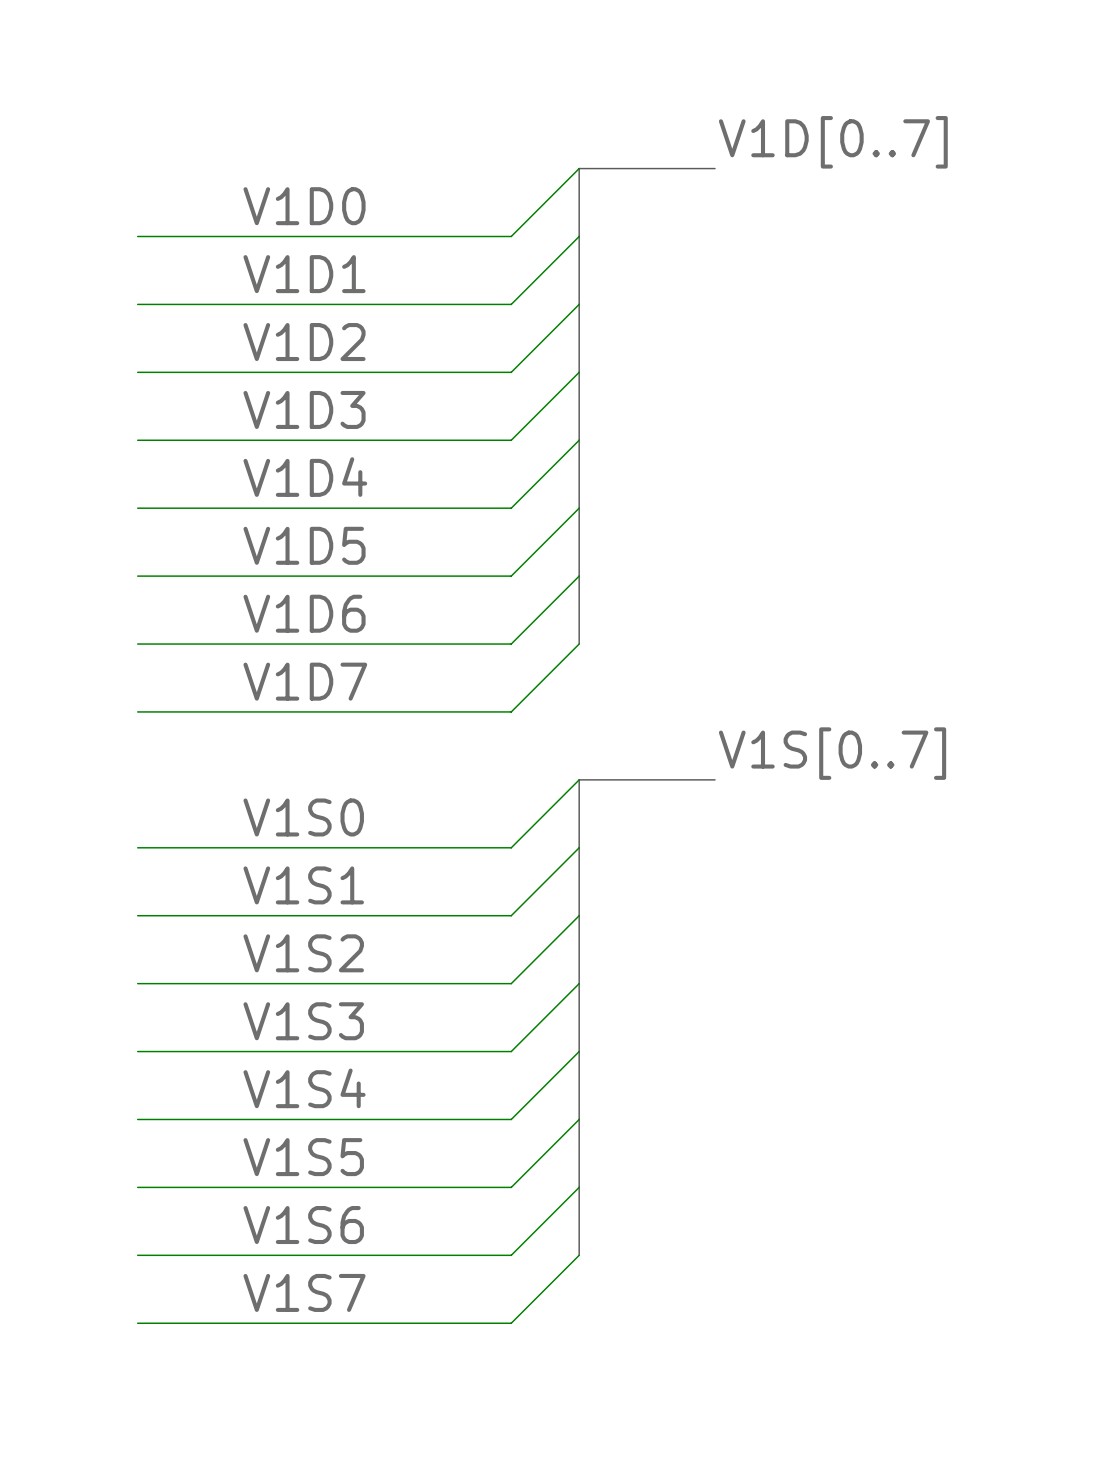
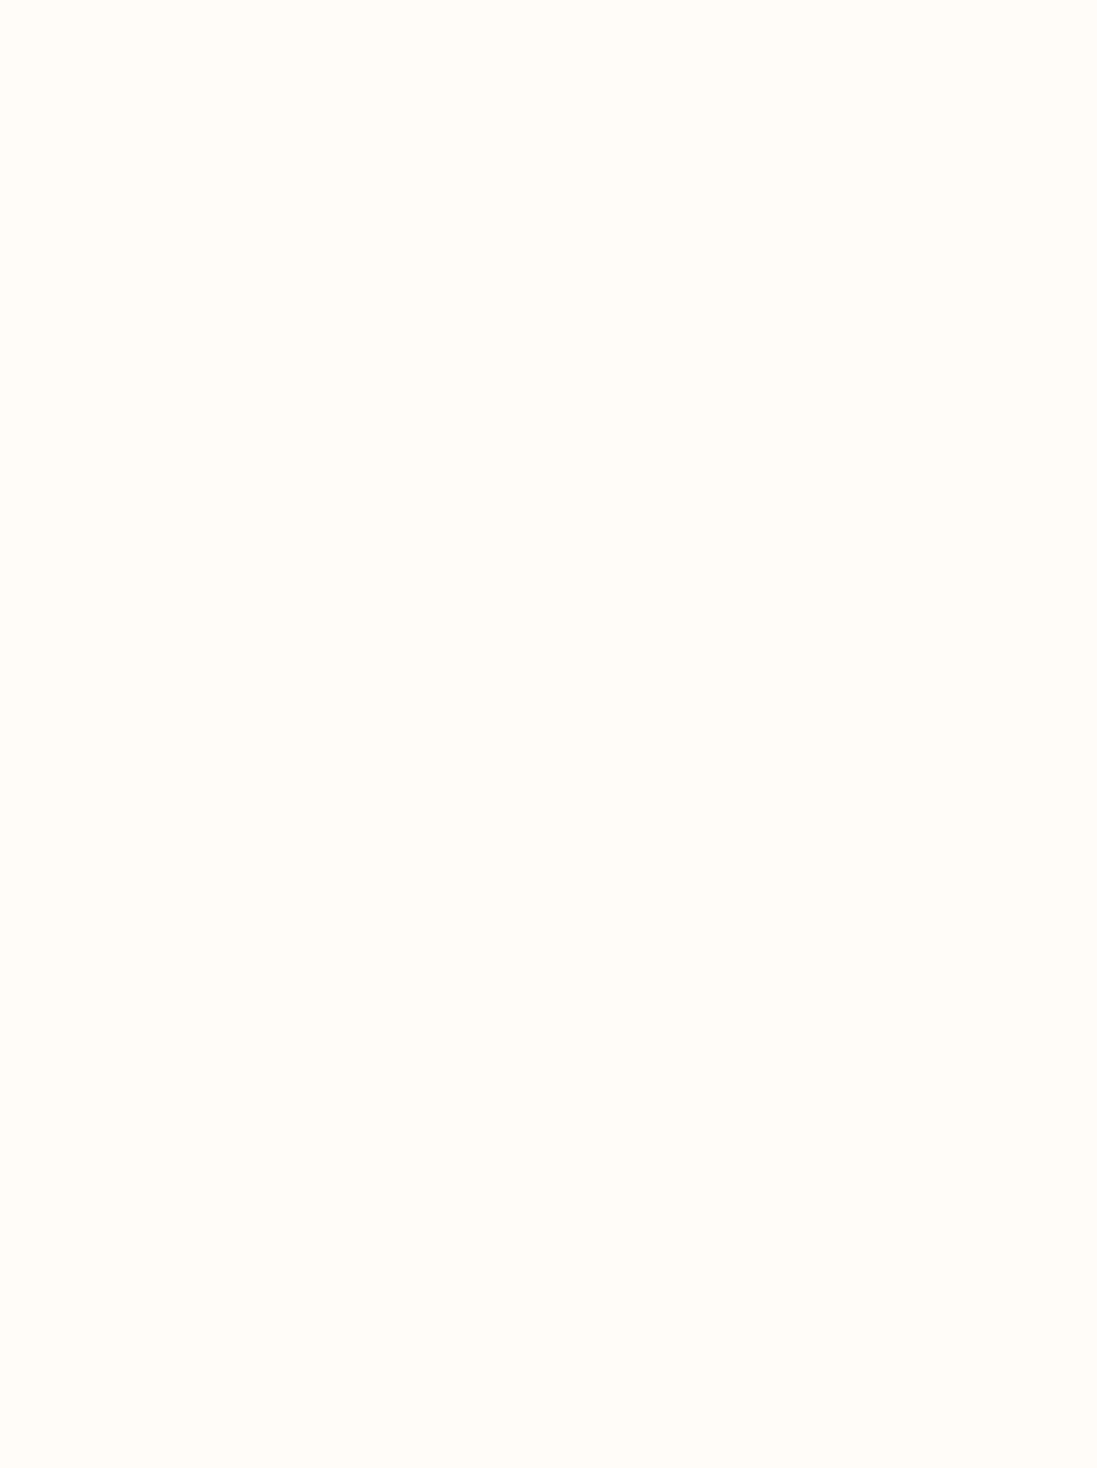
label: V1D[0..7] (833, 142) -> none
wire: (579, 168) (511, 236) (137, 236) -> none
bus: (715, 168) (579, 168) (579, 644) -> none
label: V1D0 (304, 206) -> none
wire: (579, 236) (511, 304) (137, 304) -> none
label: V1D1 (304, 274) -> none
wire: (579, 304) (511, 372) (137, 372) -> none
label: V1D2 (304, 342) -> none
wire: (579, 372) (511, 440) (137, 440) -> none
label: V1D3 (304, 409) -> none
wire: (579, 440) (511, 508) (137, 508) -> none
label: V1D4 (305, 477) -> none
wire: (579, 508) (511, 576) (137, 576) -> none
label: V1D5 (304, 545) -> none
wire: (579, 576) (511, 644) (137, 644) -> none
label: V1D6 (304, 613) -> none
wire: (579, 644) (511, 711) (137, 711) -> none
label: V1D7 (305, 681) -> none
label: V1S[0..7] (832, 753) -> none
wire: (579, 779) (511, 847) (137, 847) -> none
bus: (715, 779) (579, 779) (579, 1255) -> none
label: V1S0 (303, 817) -> none
wire: (579, 847) (511, 915) (137, 915) -> none
label: V1S1 (303, 885) -> none
wire: (579, 915) (511, 983) (137, 983) -> none
label: V1S2 (303, 953) -> none
wire: (579, 983) (511, 1051) (137, 1051) -> none
label: V1S3 (303, 1021) -> none
wire: (579, 1051) (511, 1119) (137, 1119) -> none
label: V1S4 (304, 1088) -> none
wire: (579, 1119) (511, 1187) (137, 1187) -> none
label: V1S5 (303, 1157) -> none
wire: (579, 1187) (511, 1255) (137, 1255) -> none
label: V1S6 (303, 1225) -> none
wire: (579, 1255) (511, 1323) (137, 1323) -> none
label: V1S7 (304, 1292) -> none

